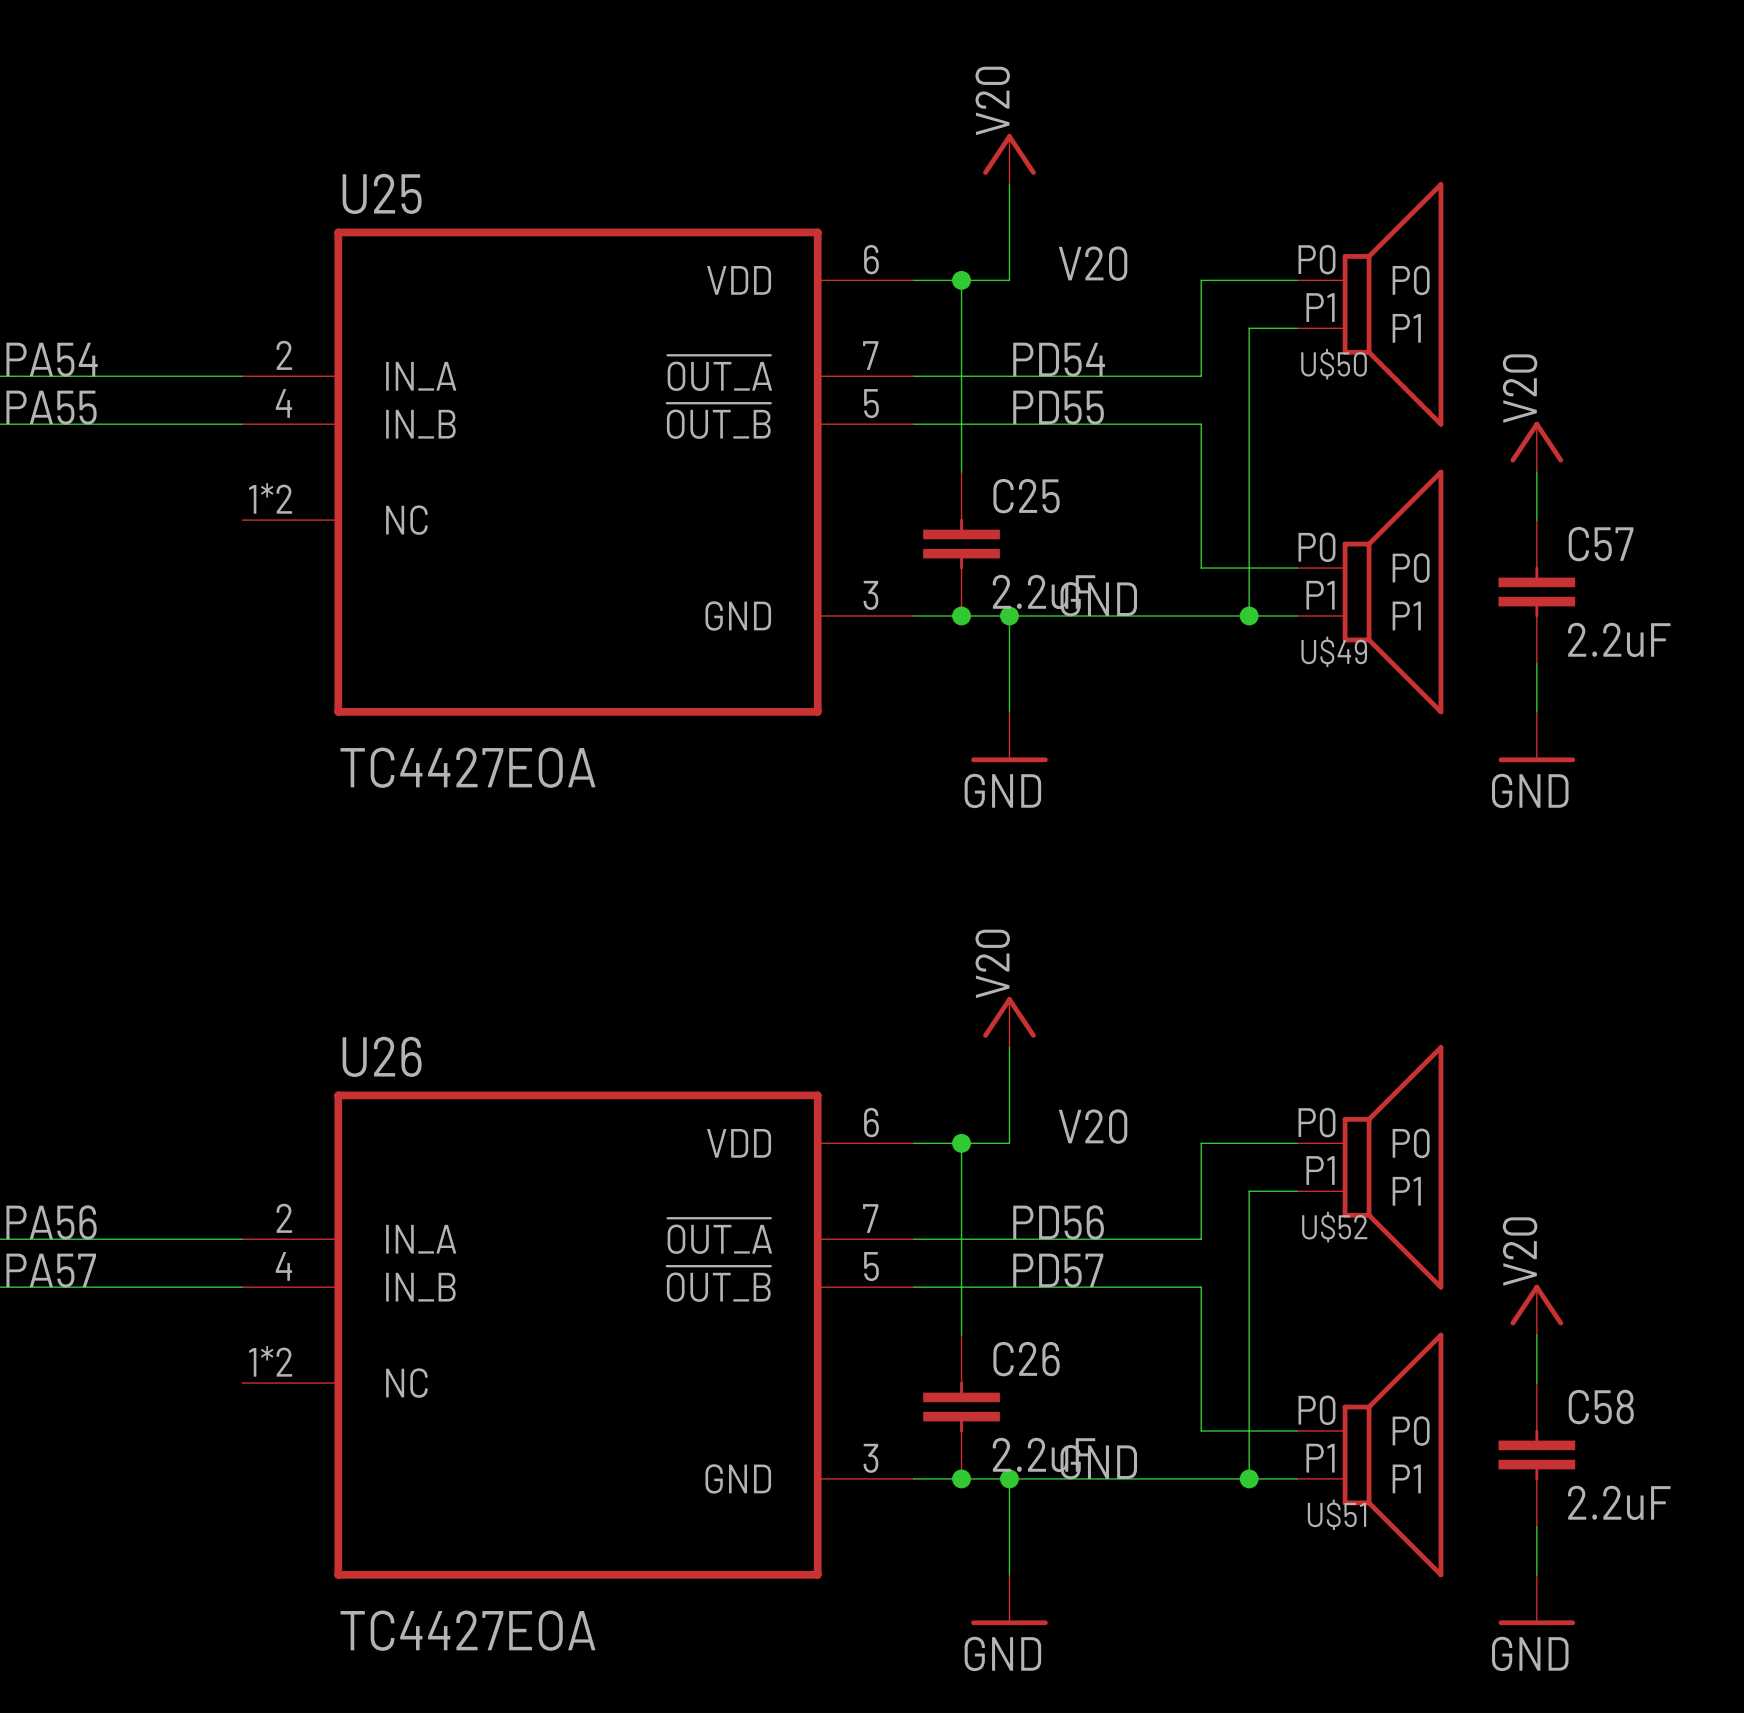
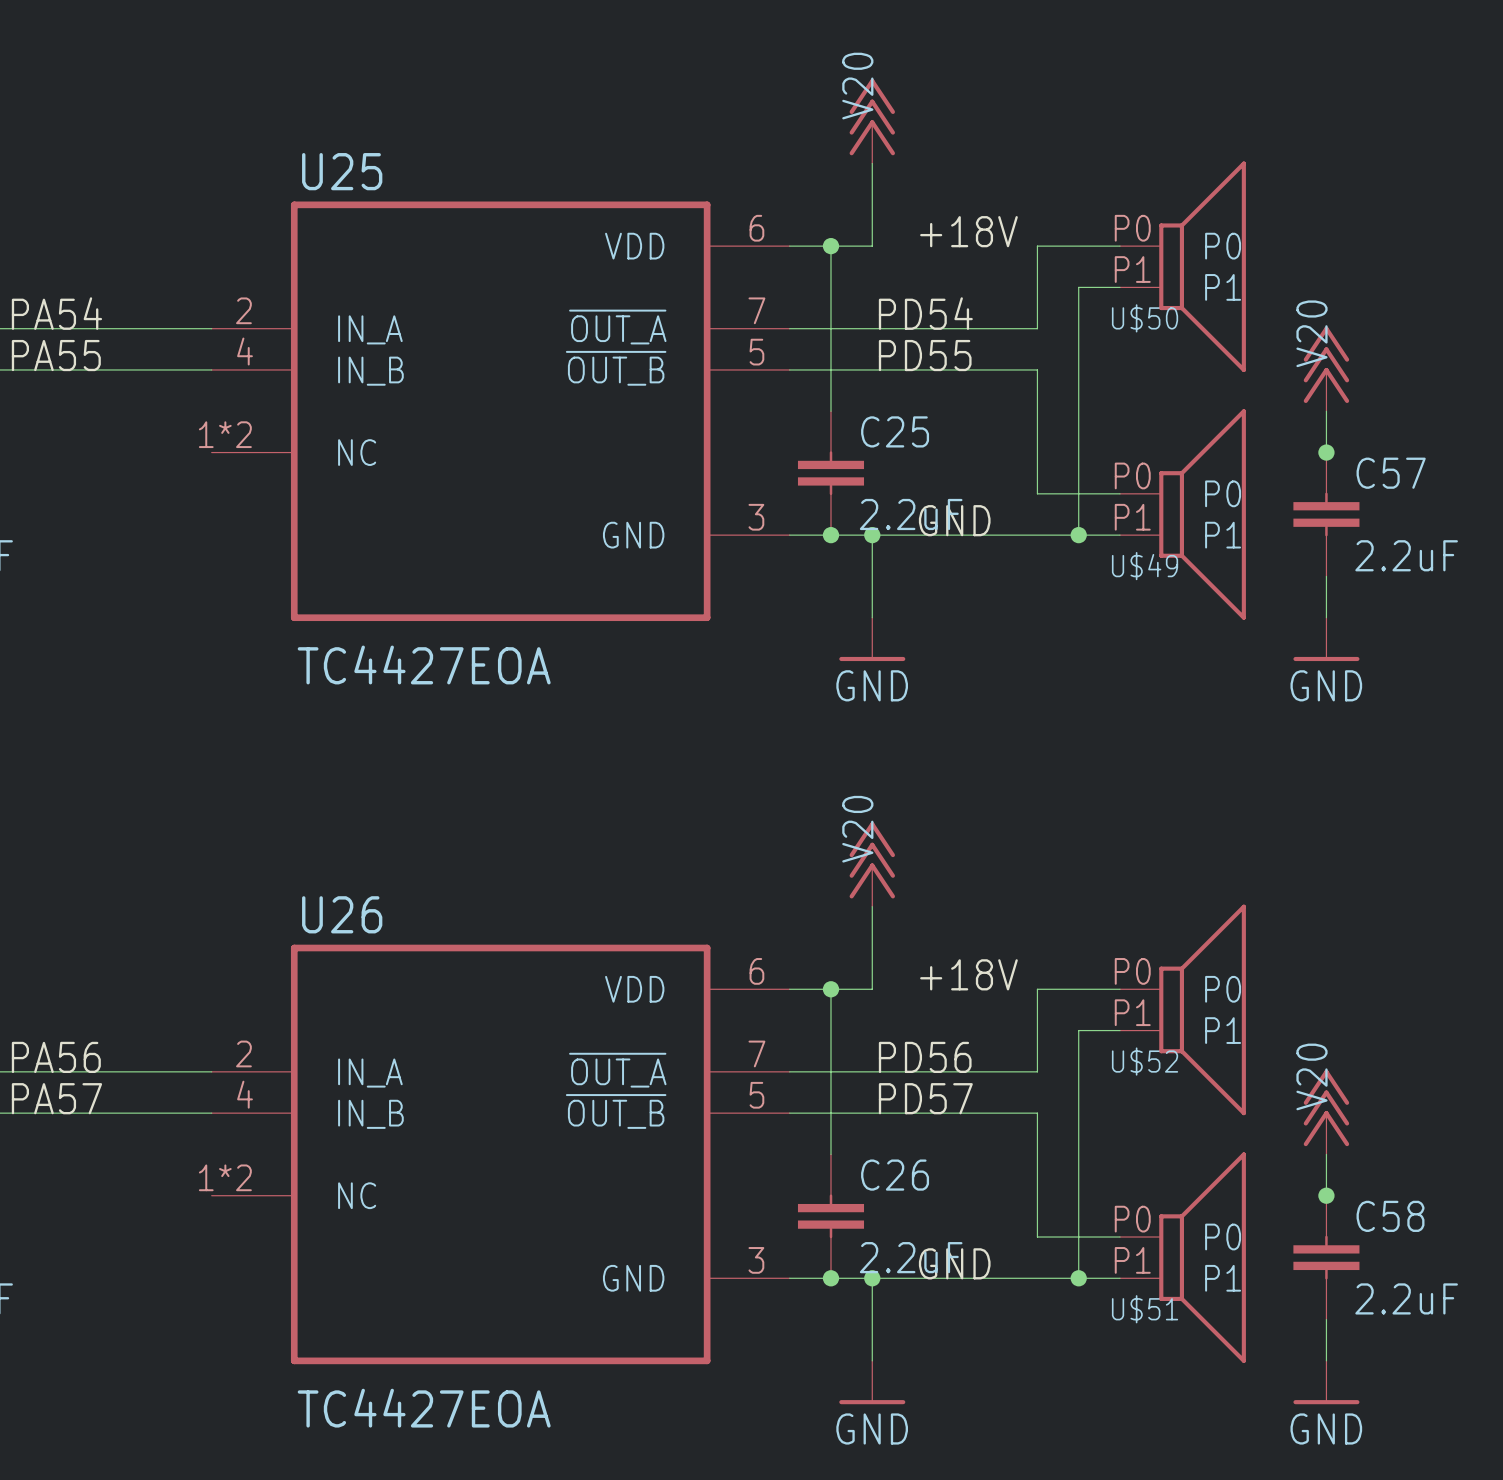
power symbol: none -> V20 (872, 121)
power symbol: V20 (1009, 159) -> none
label: V20 (1093, 263) -> +18V (968, 231)
power symbol: none -> V20 (1326, 368)
power symbol: V20 (1536, 446) -> none
junction: none -> (1326, 452)
power symbol: none -> V20 (872, 864)
power symbol: V20 (1009, 1022) -> none
label: V20 (1093, 1126) -> +18V (968, 974)
power symbol: none -> V20 (1326, 1112)
power symbol: V20 (1536, 1309) -> none
junction: none -> (1326, 1195)

